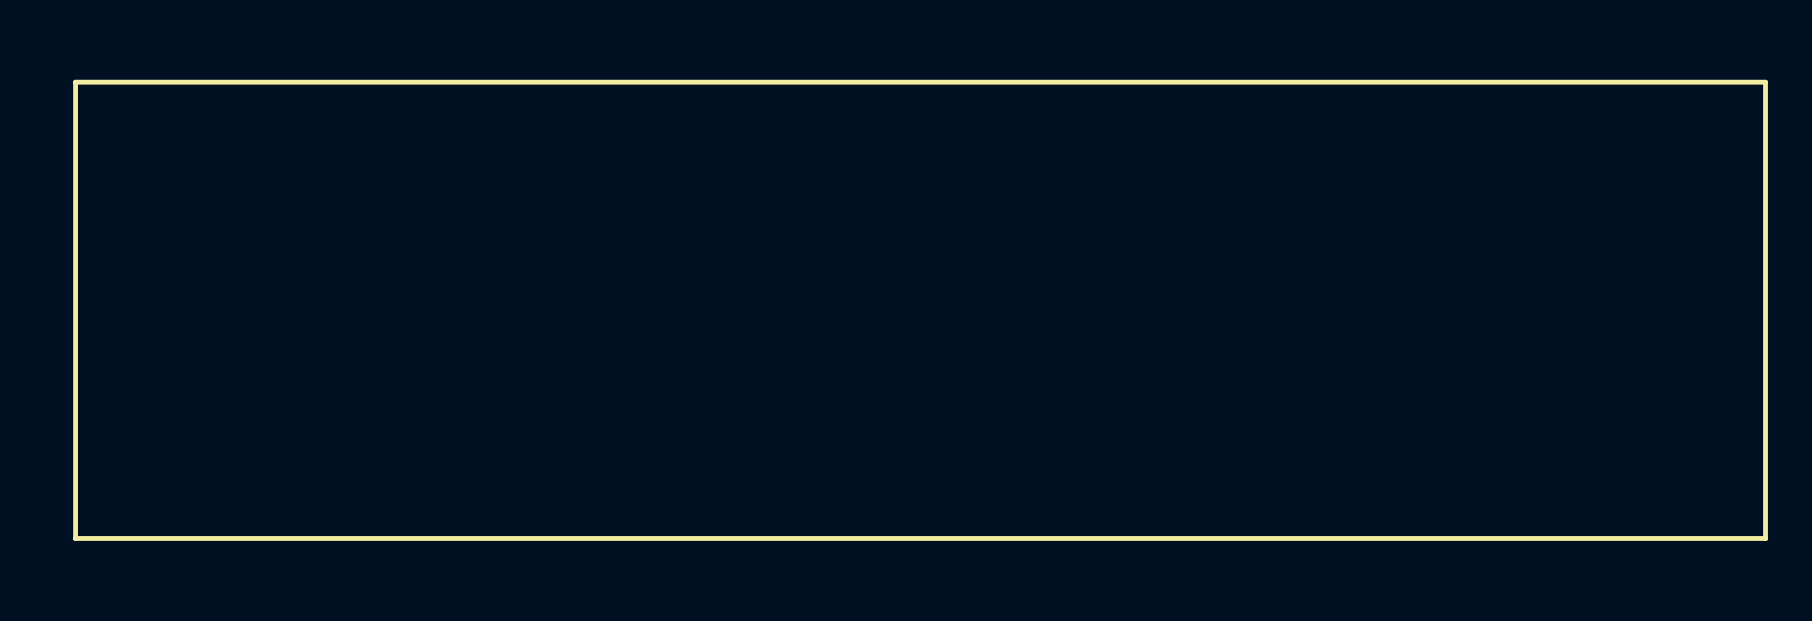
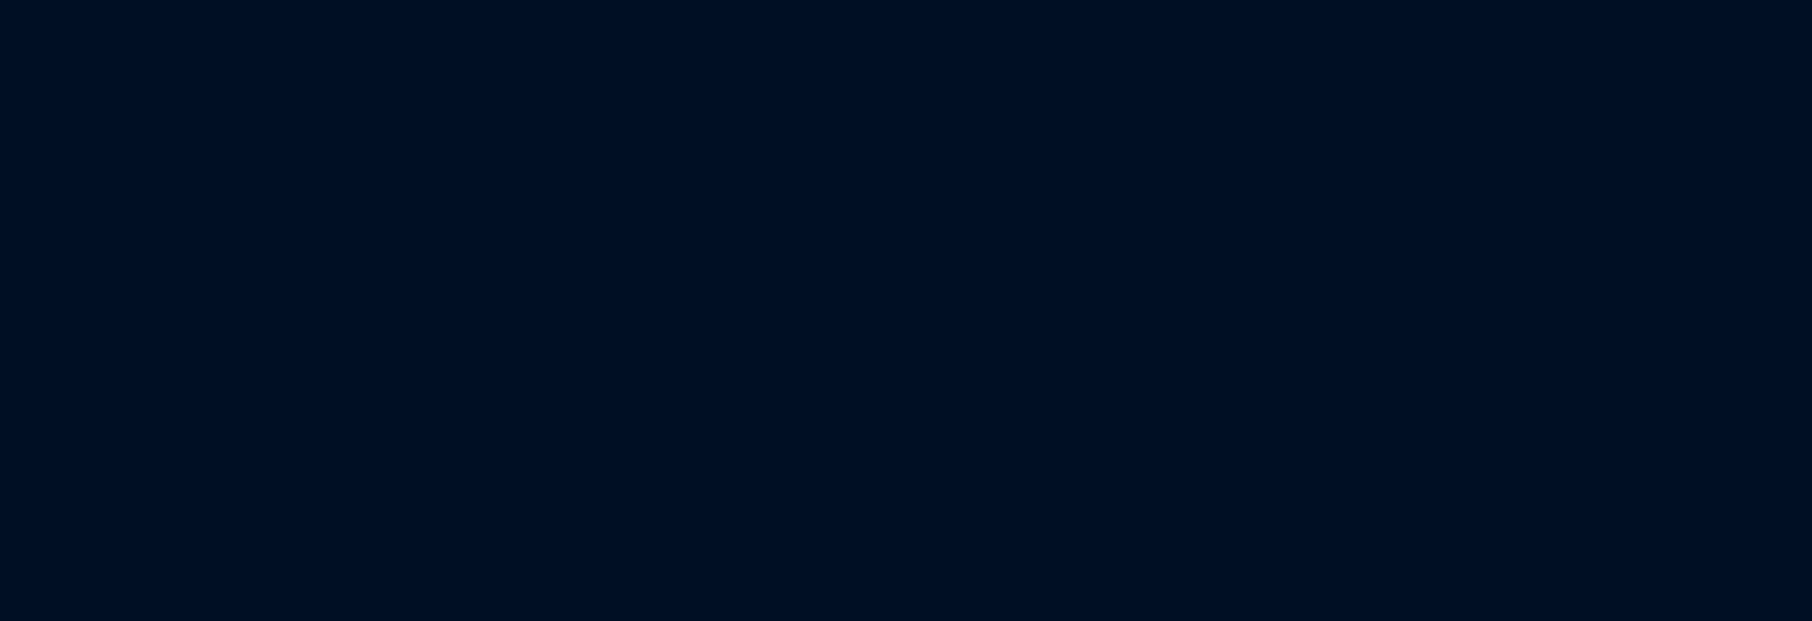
line: (75, 82) (75, 538) (1765, 538) (1765, 82) (75, 82) -> none

